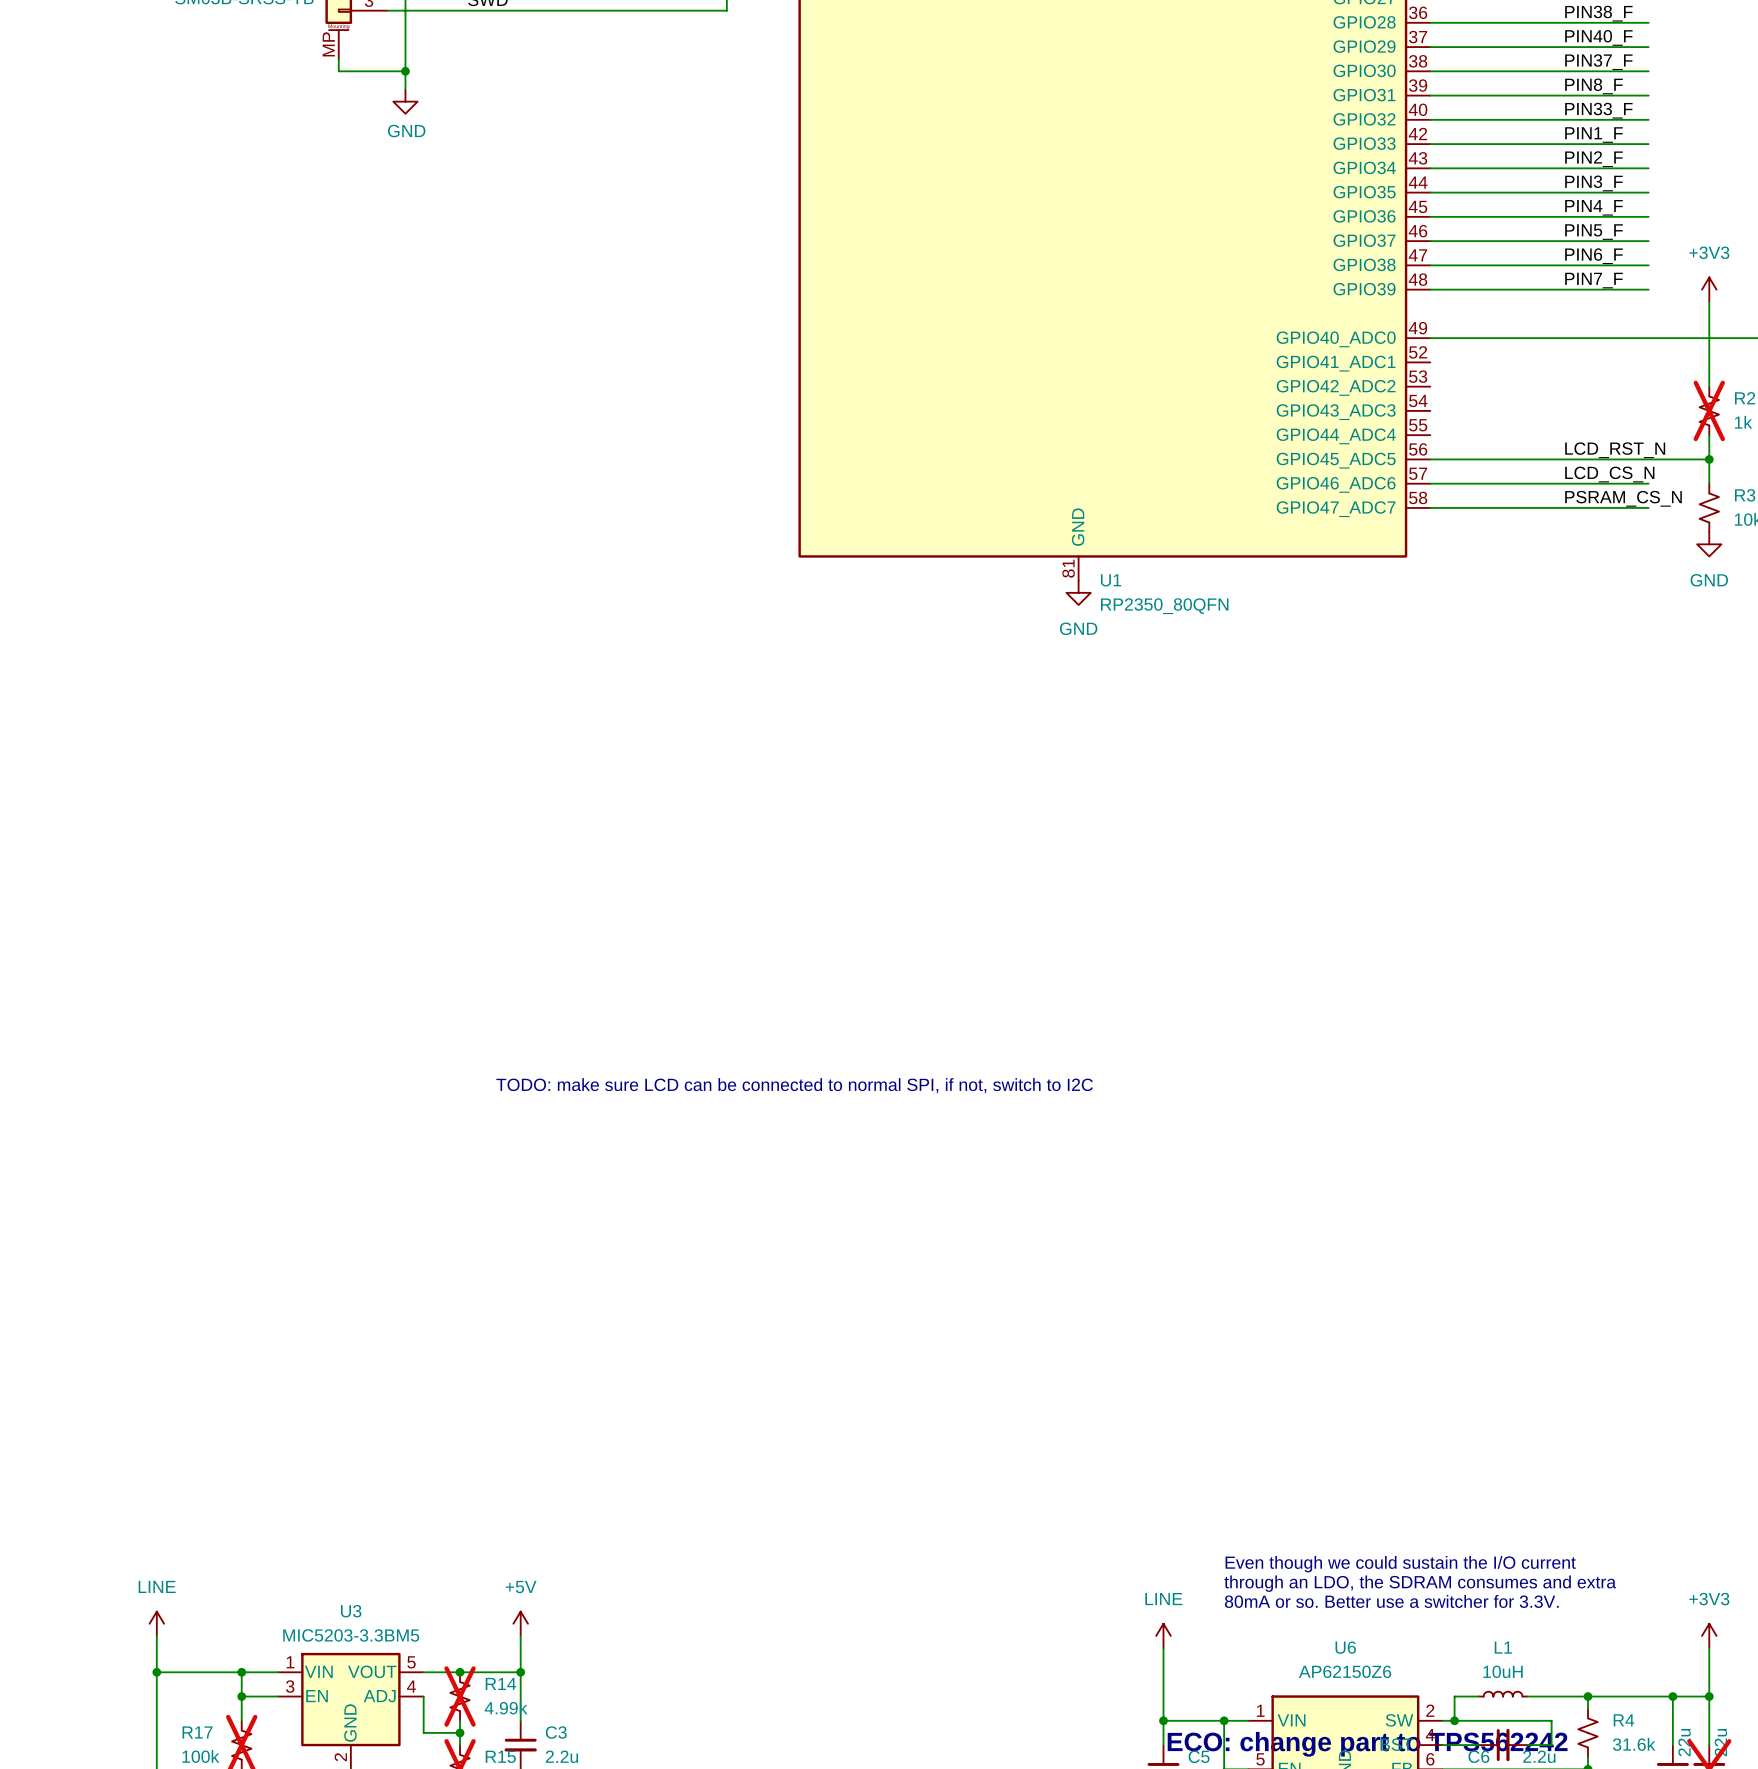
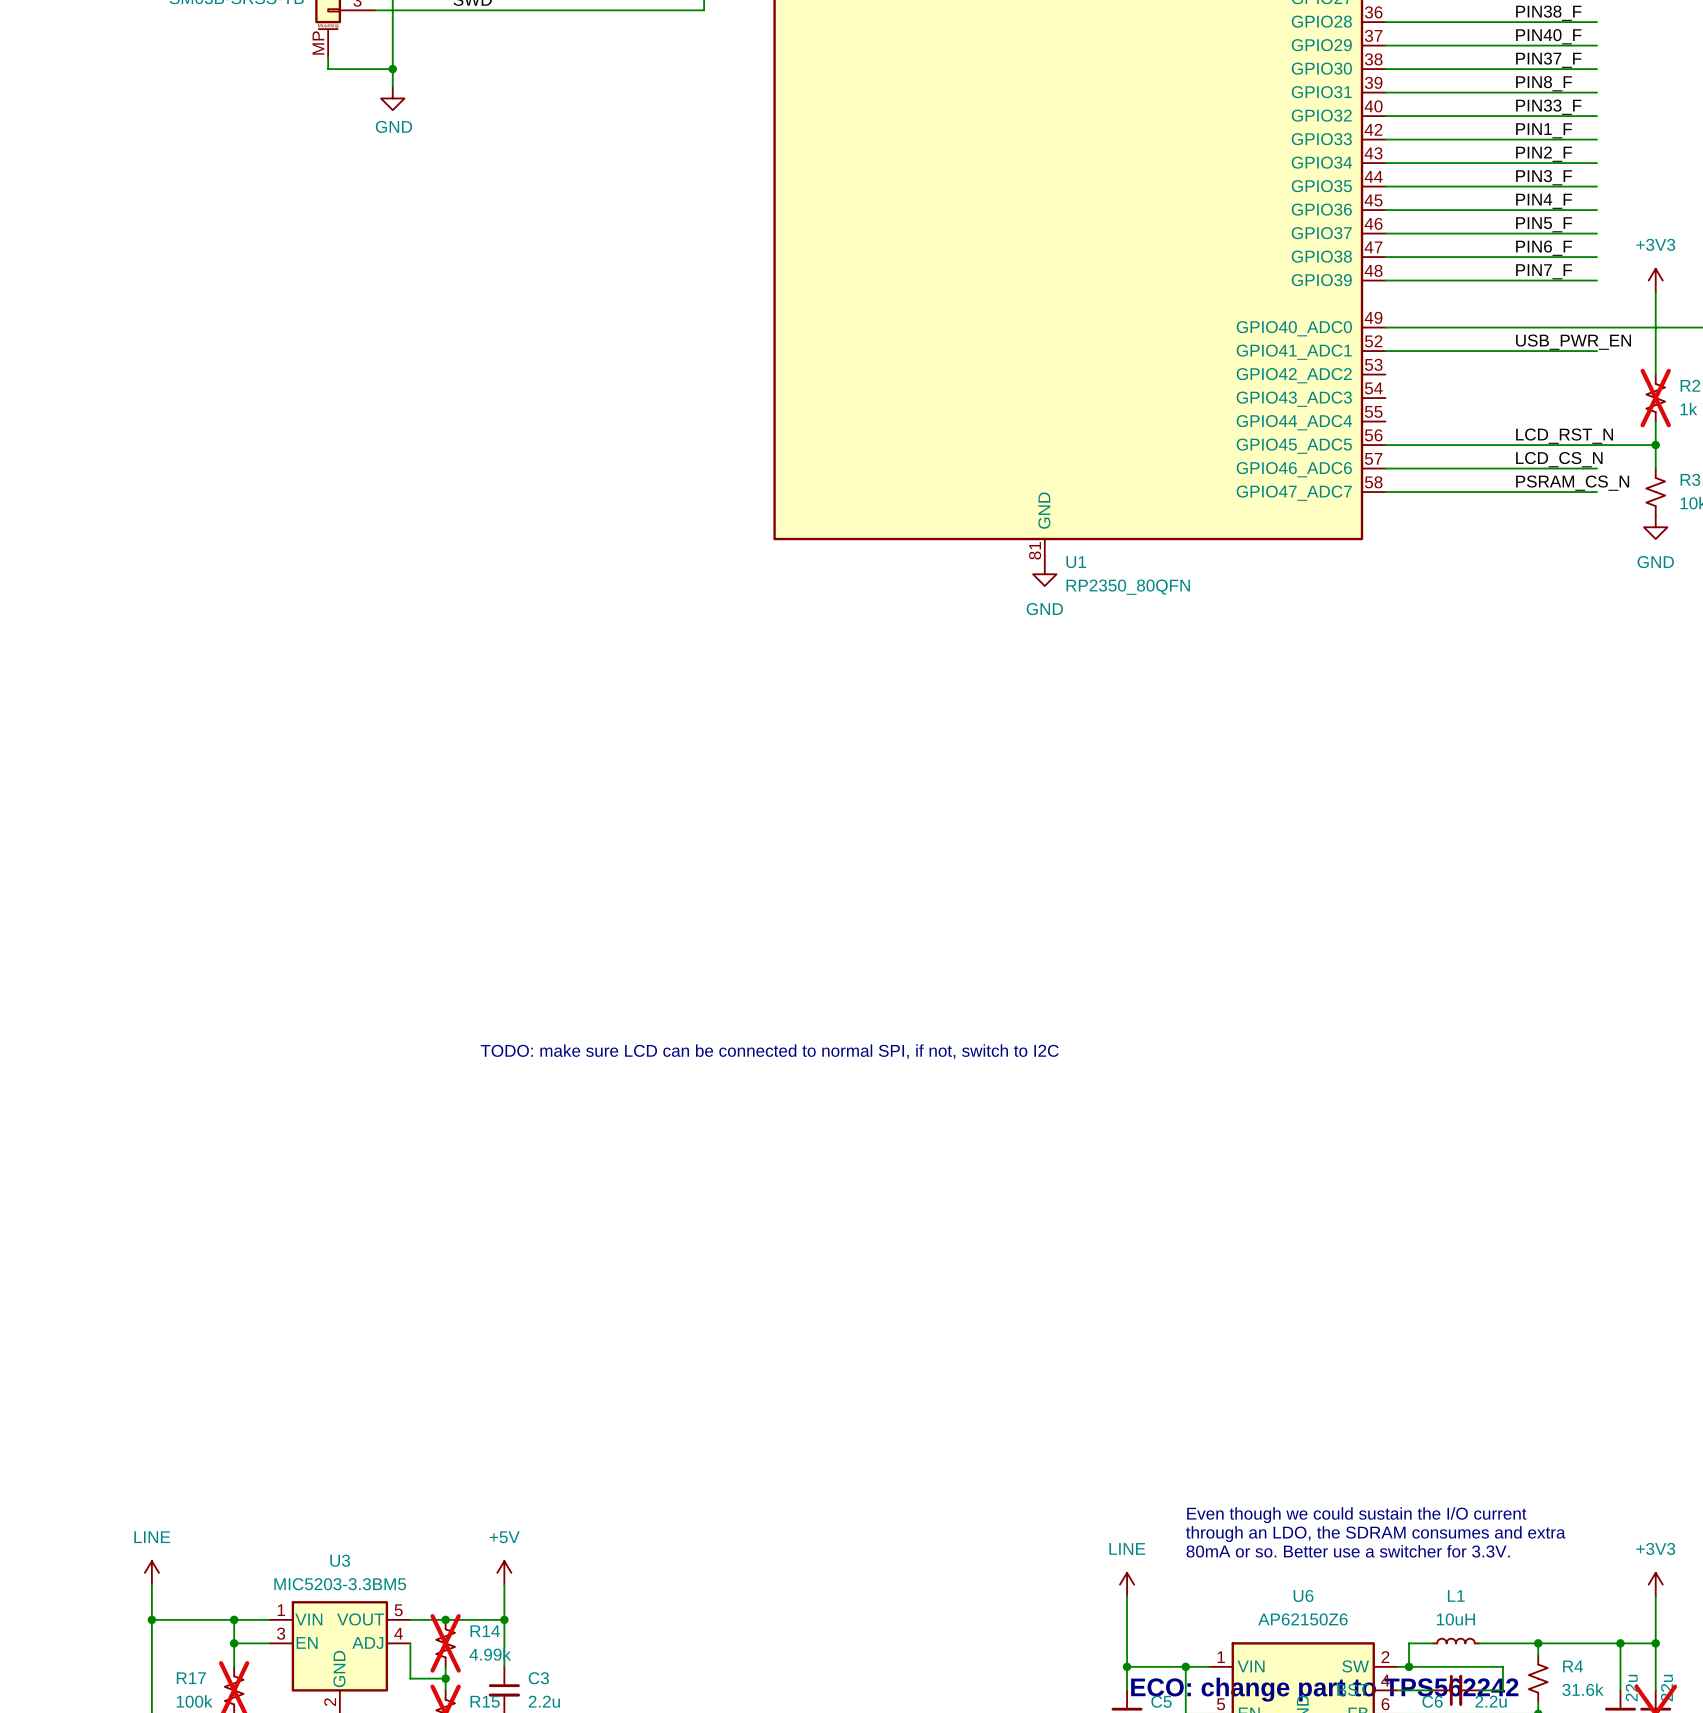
label: none -> USB_PWR_EN (1573, 342)
wire: none -> (1385, 351) (1596, 351)

